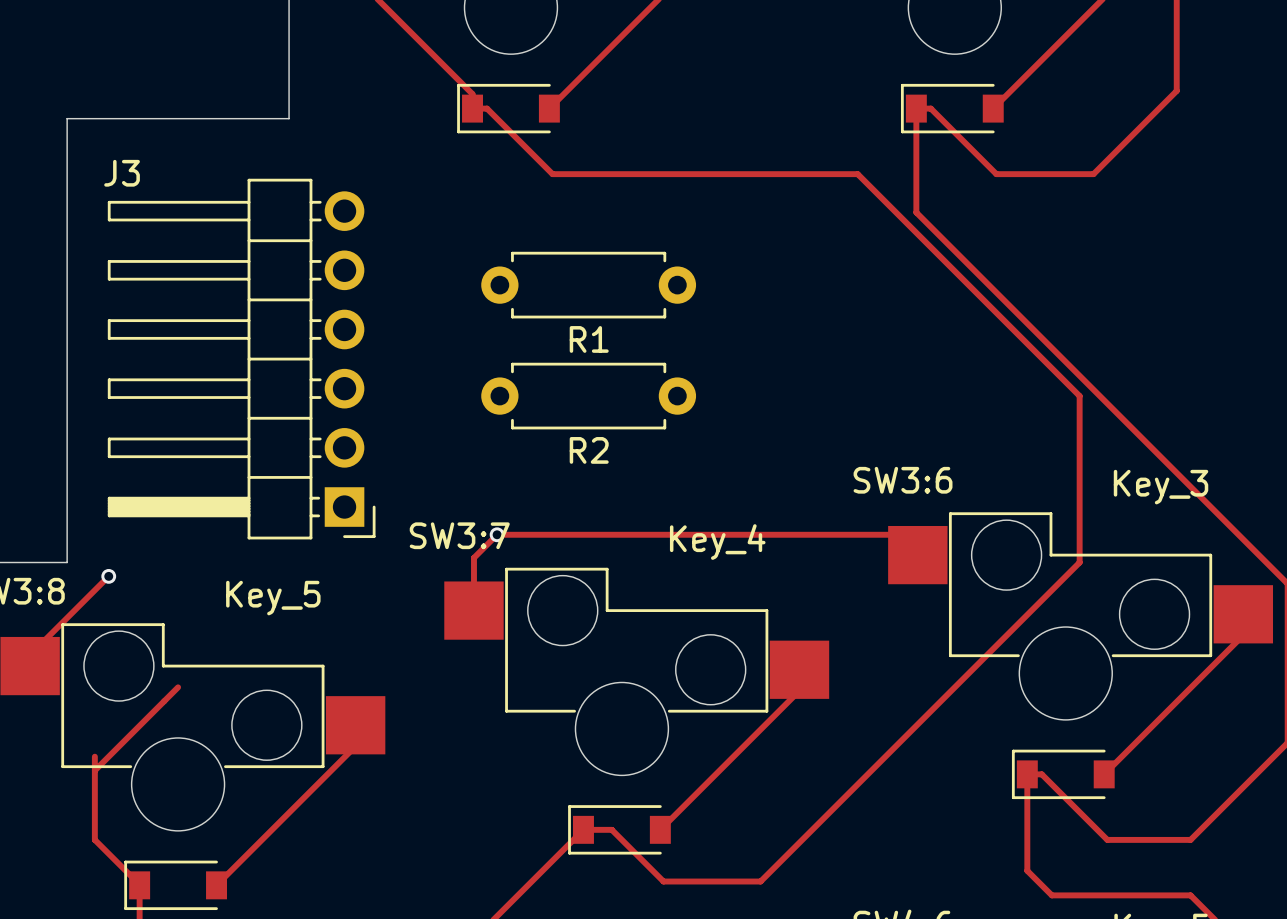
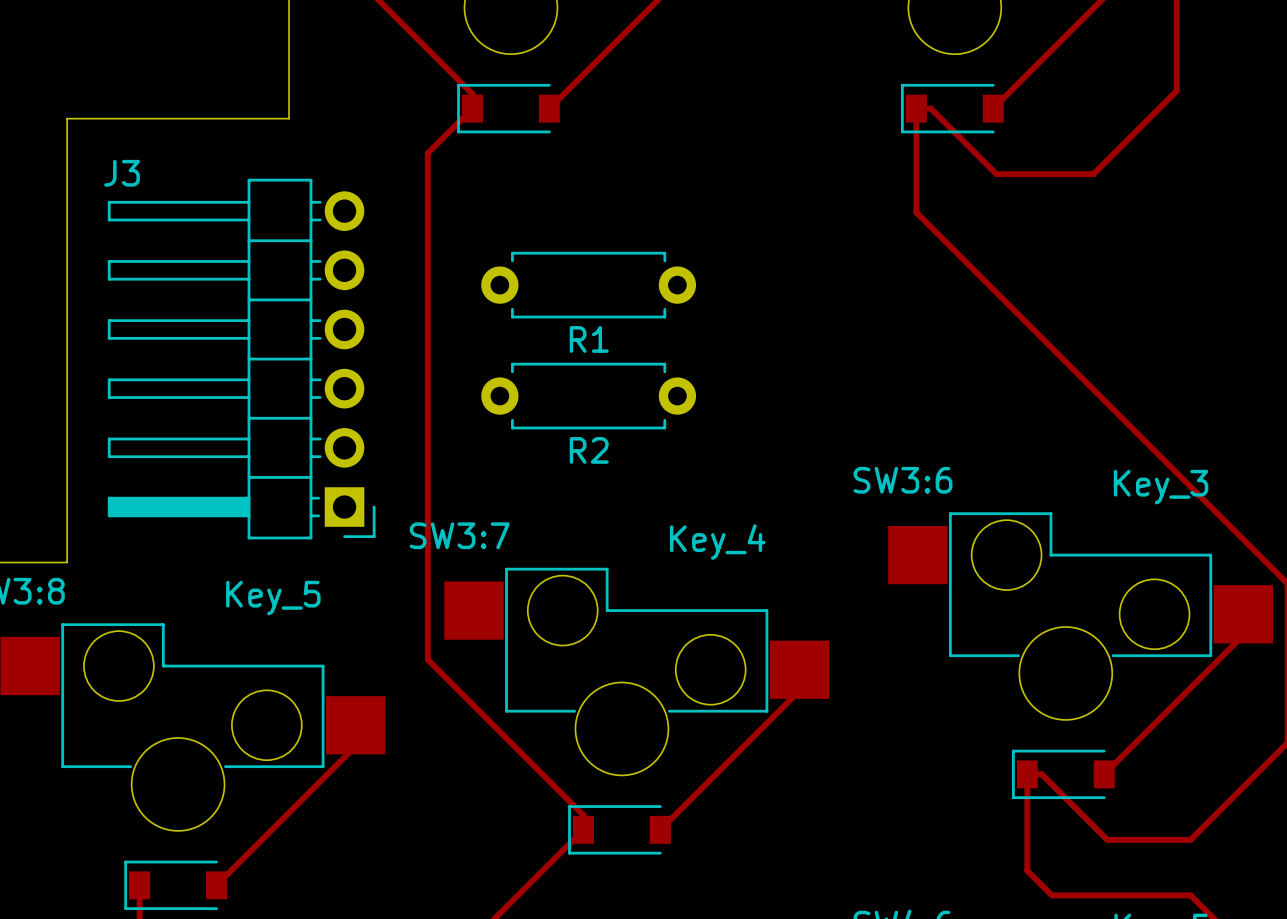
track: (472, 108) (487, 108) (552, 174) (857, 174) (1079, 396) (1079, 562) (760, 881) (663, 881) (611, 829) (583, 829) -> (472, 108) (427, 153) (427, 659) (583, 815) (583, 829)
via: (497, 534) -> none
track: (917, 555) (897, 534) (497, 534) (473, 557) (473, 610) -> none
track: (108, 576) (30, 654) (30, 666) -> none
via: (108, 576) -> none
track: (178, 687) (94, 770) -> none
track: (94, 756) (94, 839) (139, 885) -> none

